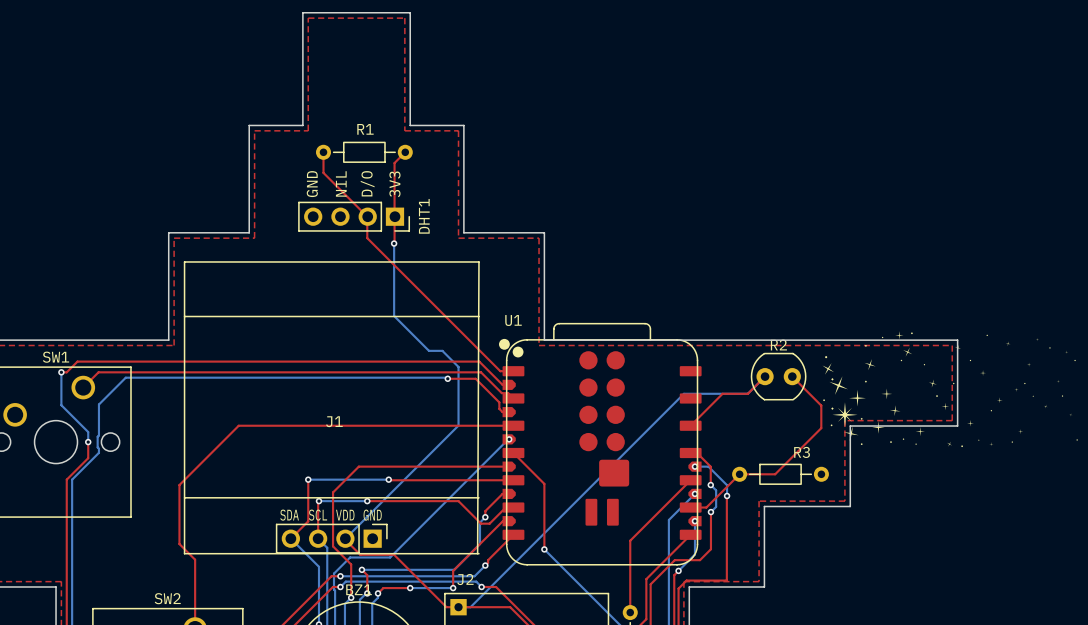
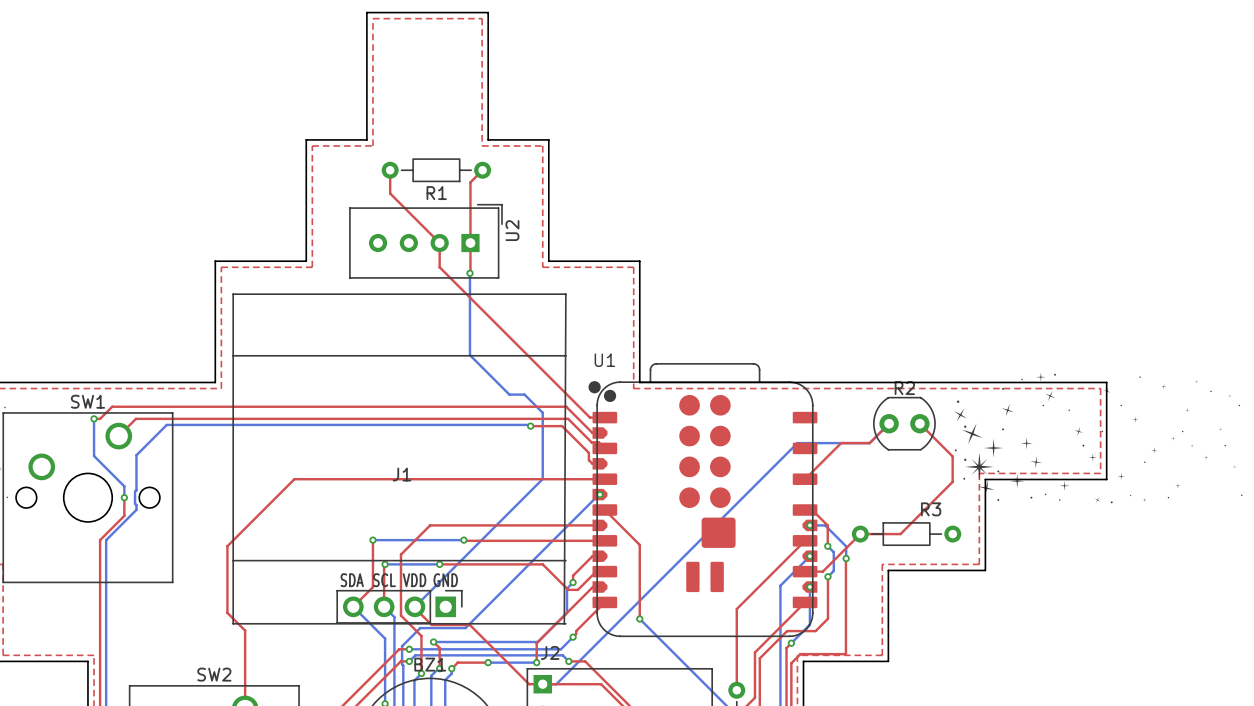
R1 name position: R1 (365, 129) -> R1 (436, 193)
text: NIL (341, 183) -> none
text: D/O (367, 183) -> none
text: GND (312, 184) -> none
text: 3V3 (394, 184) -> none
U2: none -> (425, 241)
DHT1: (354, 216) -> none

